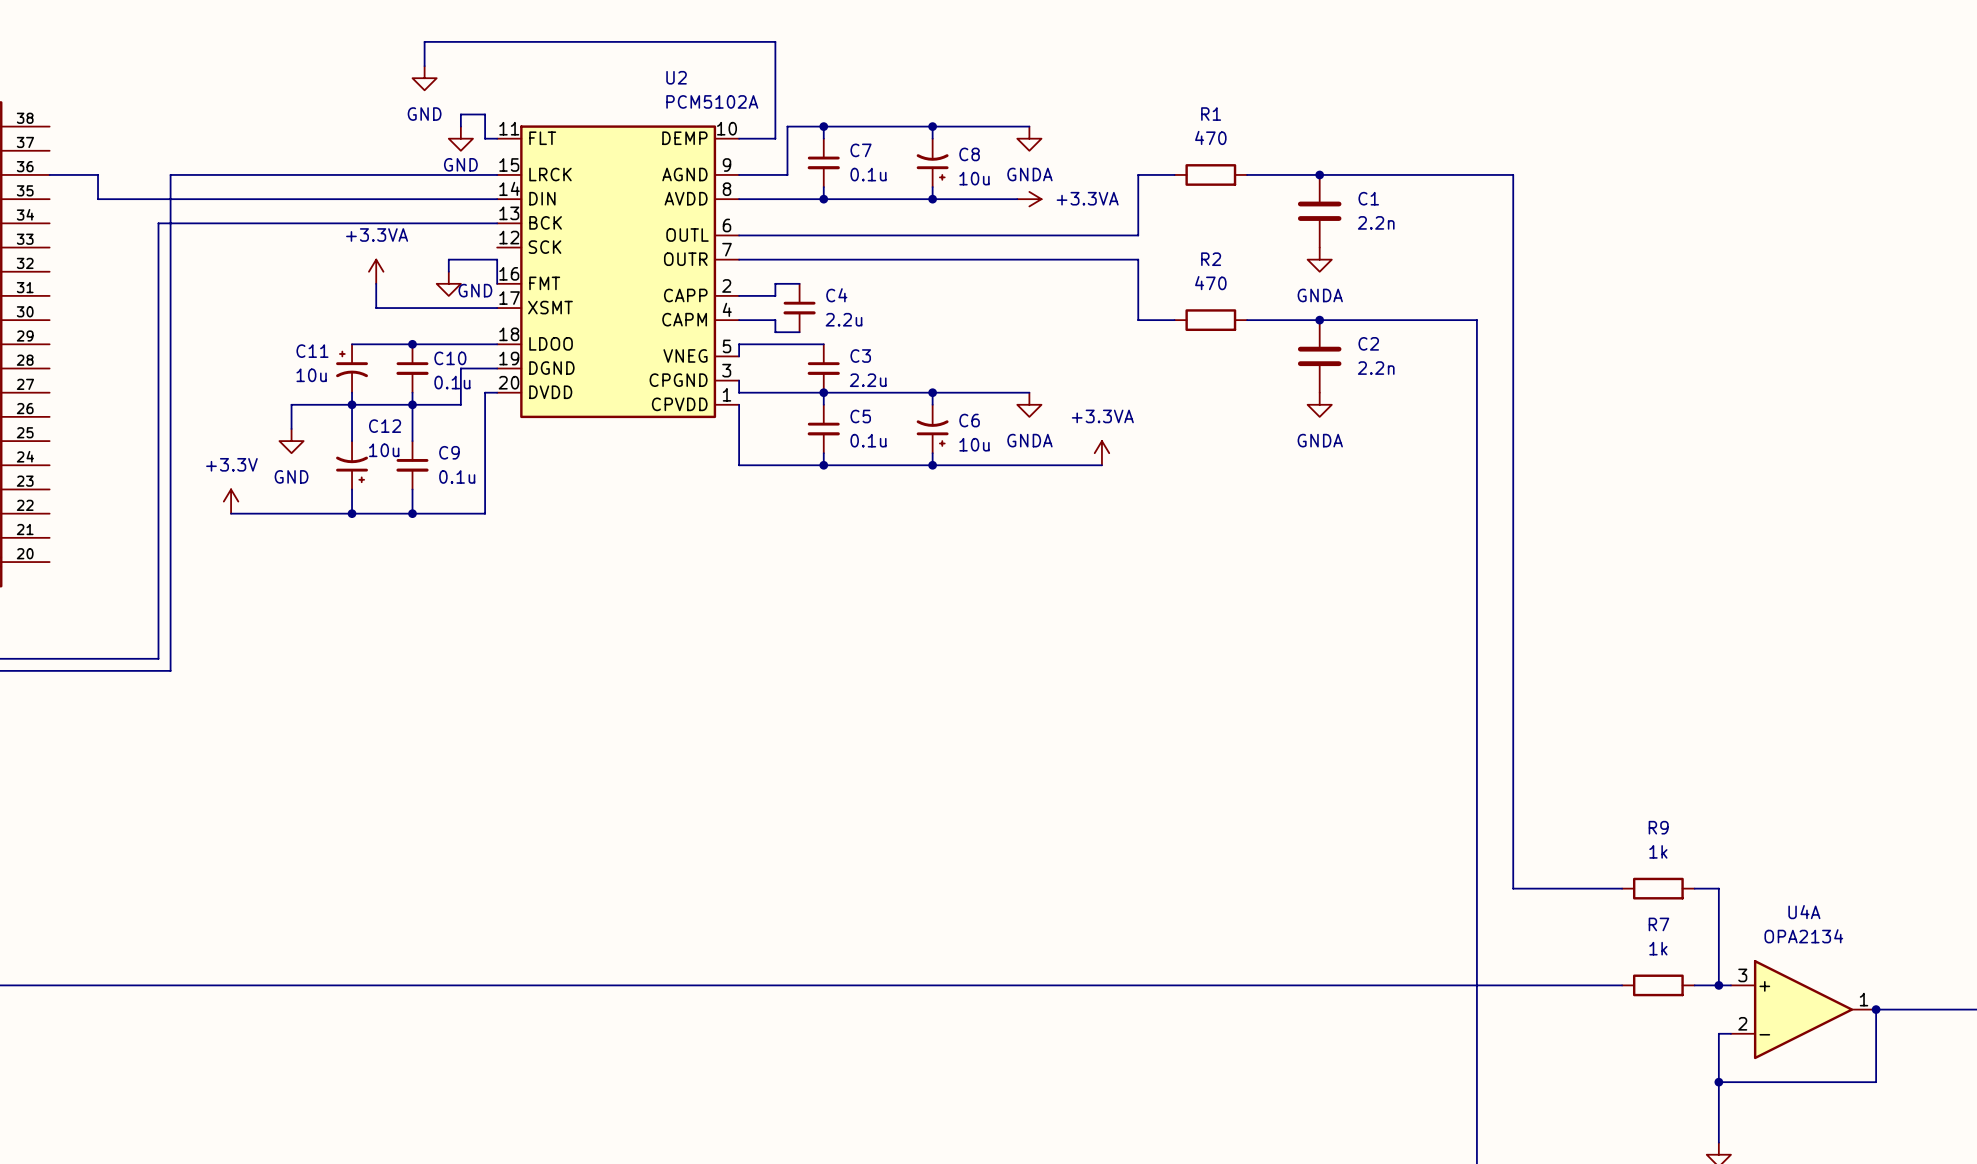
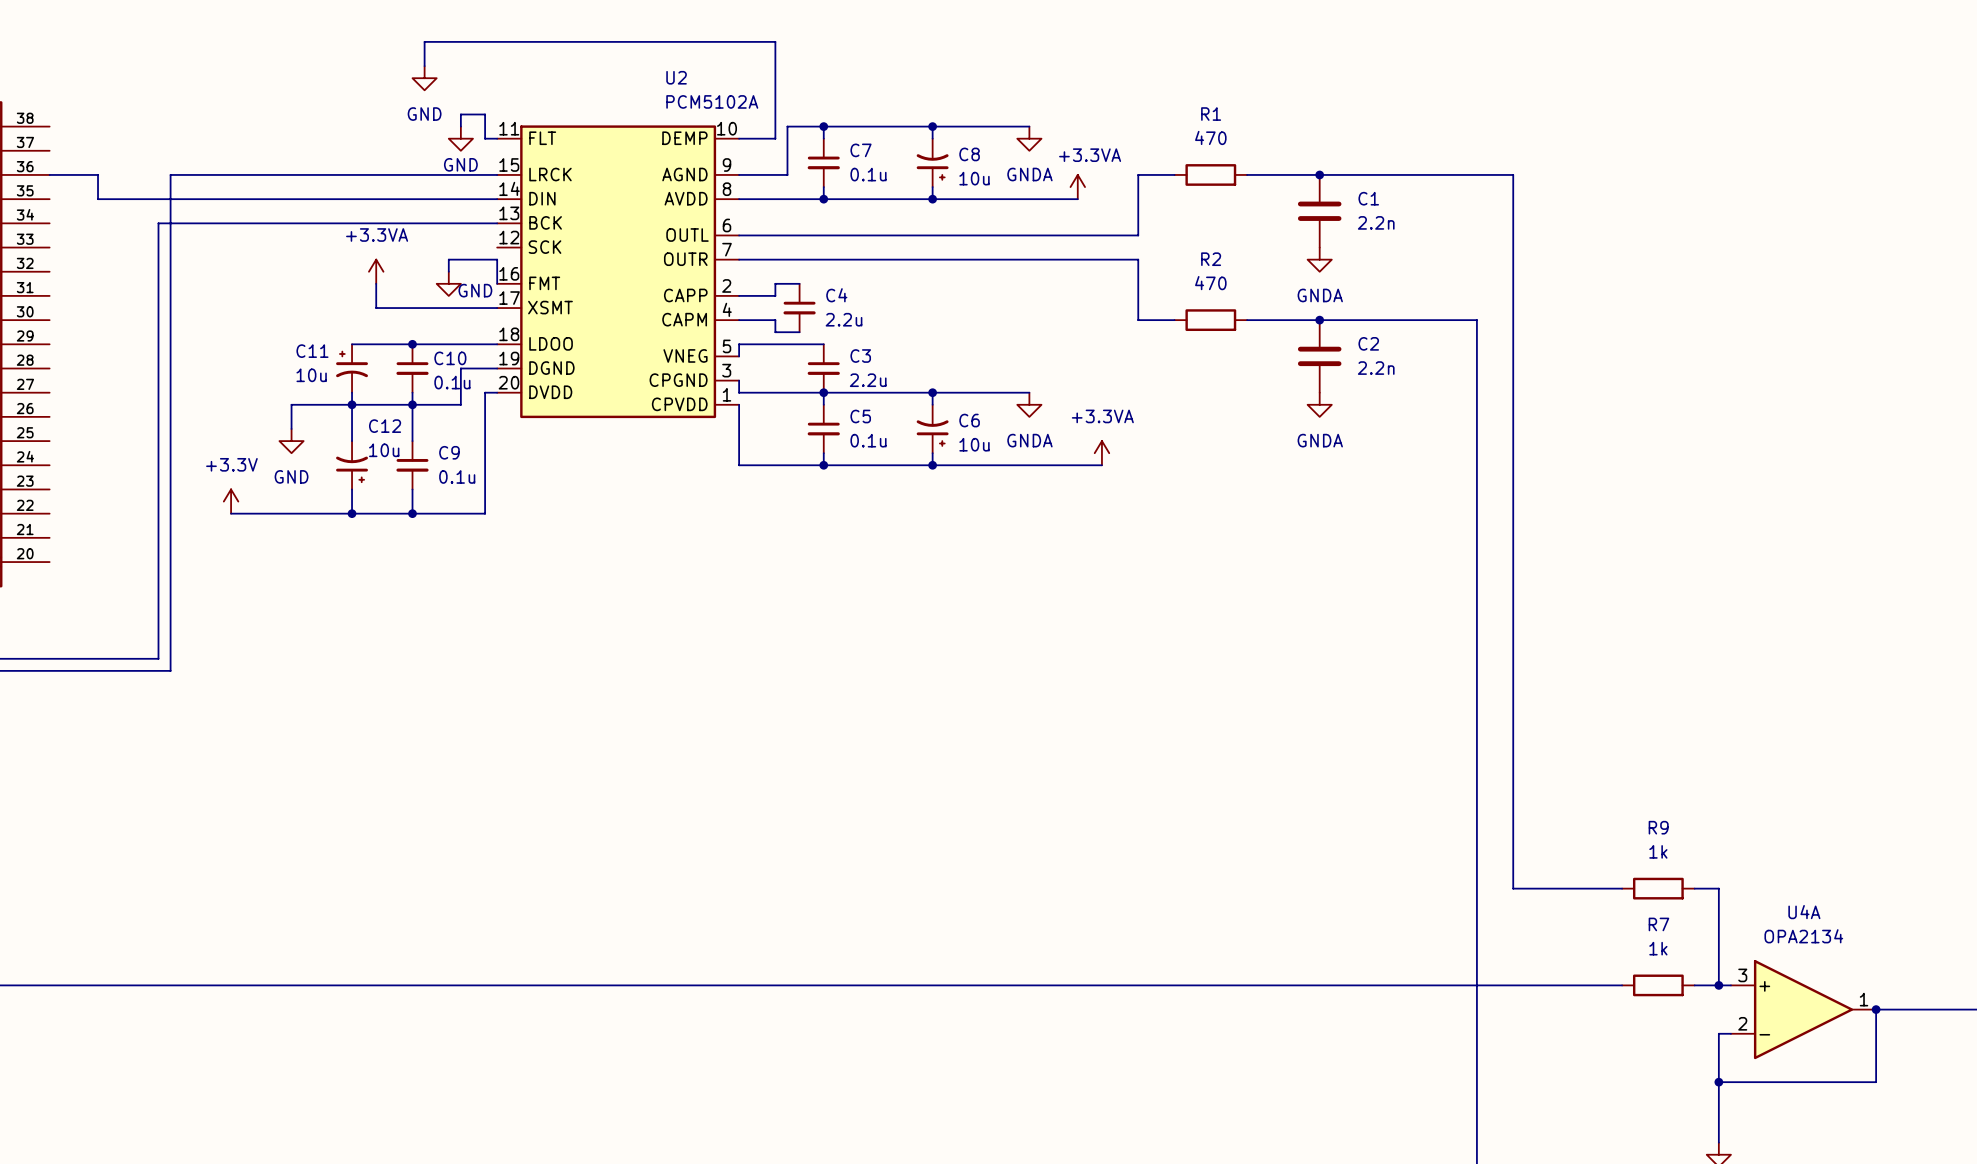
power symbol text position: +3.3VA (1087, 198) -> +3.3VA (1090, 155)
wire: none -> (1017, 199) (1077, 199)
power symbol rotation: 0° (1029, 199) -> 90° counterclockwise (1077, 187)
power symbol position: +3.3VA (1029, 199) -> +3.3VA (1077, 187)

